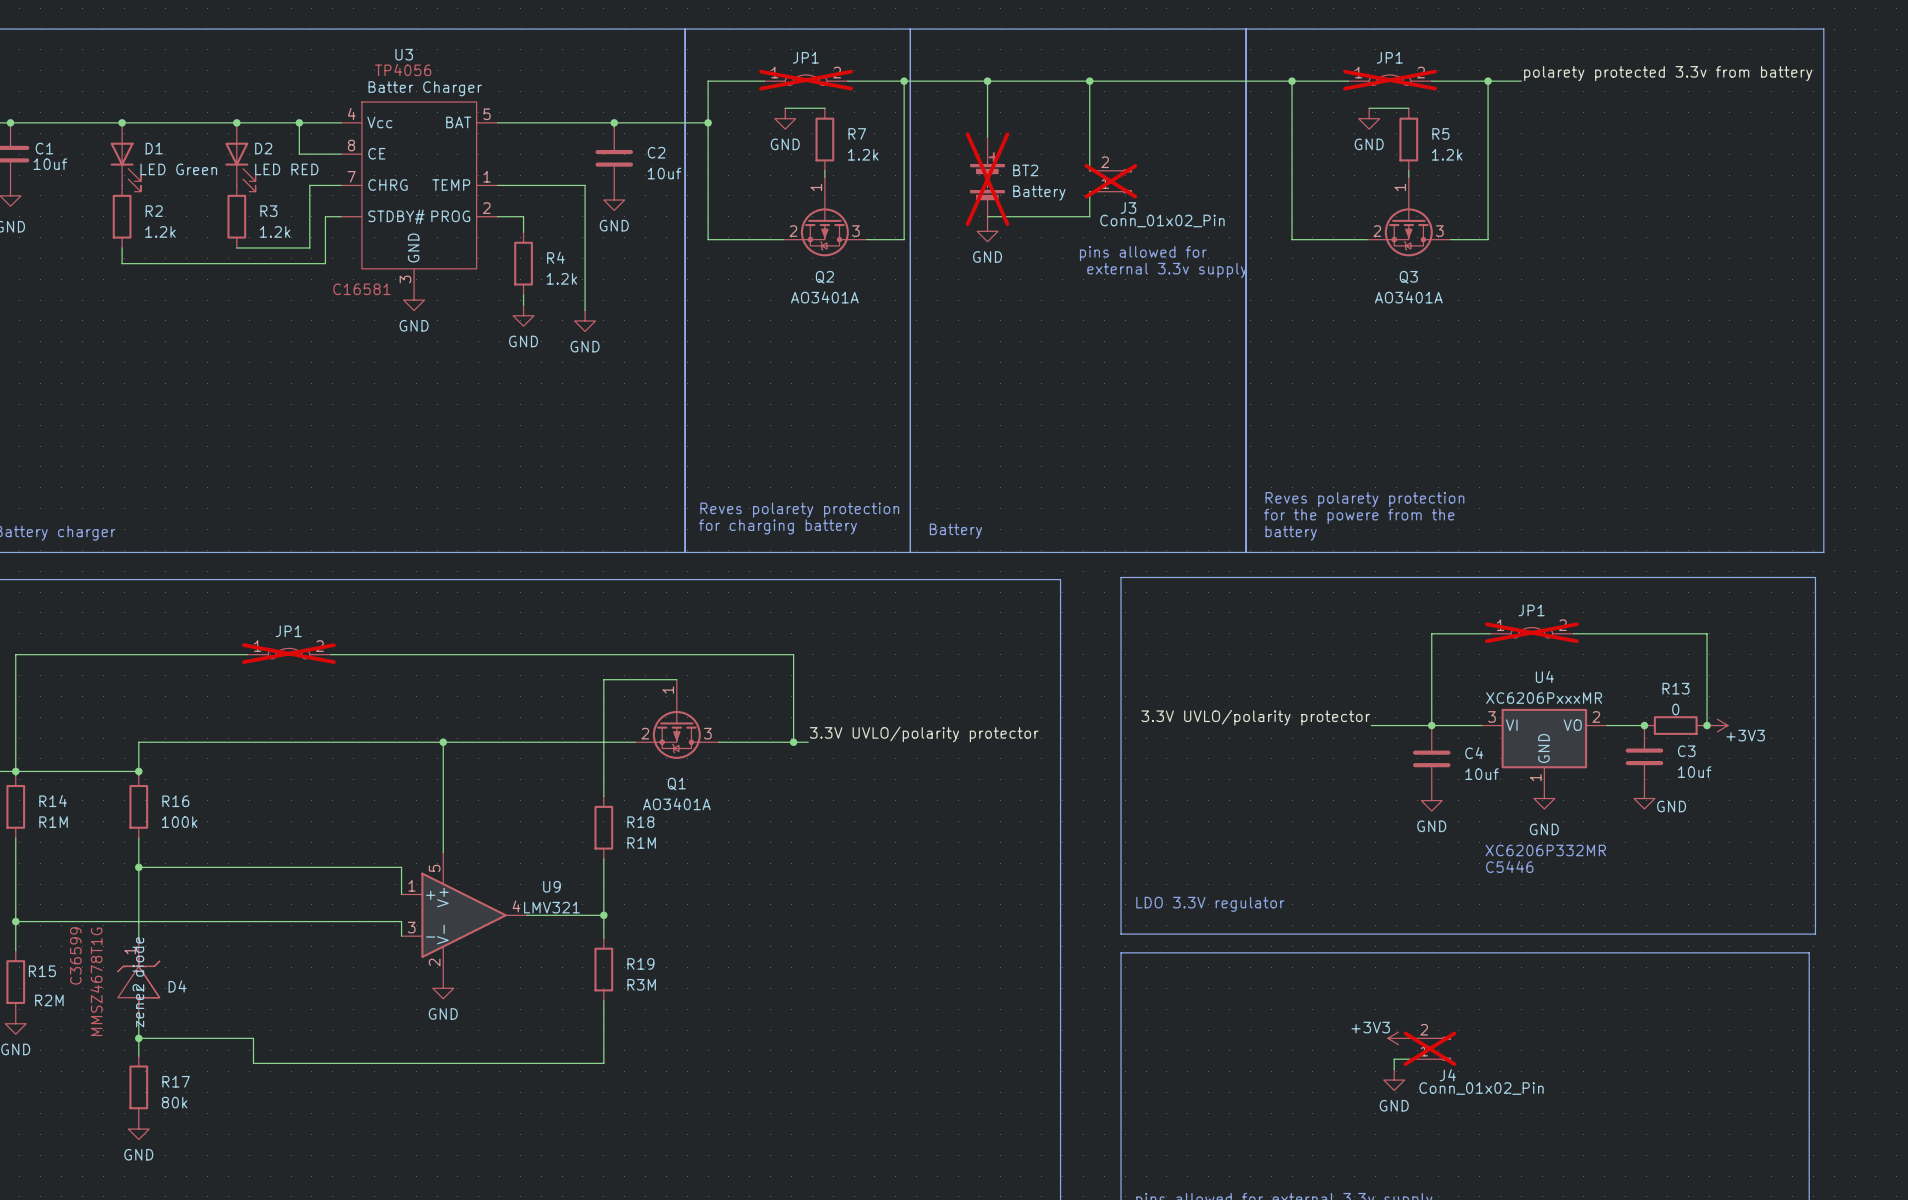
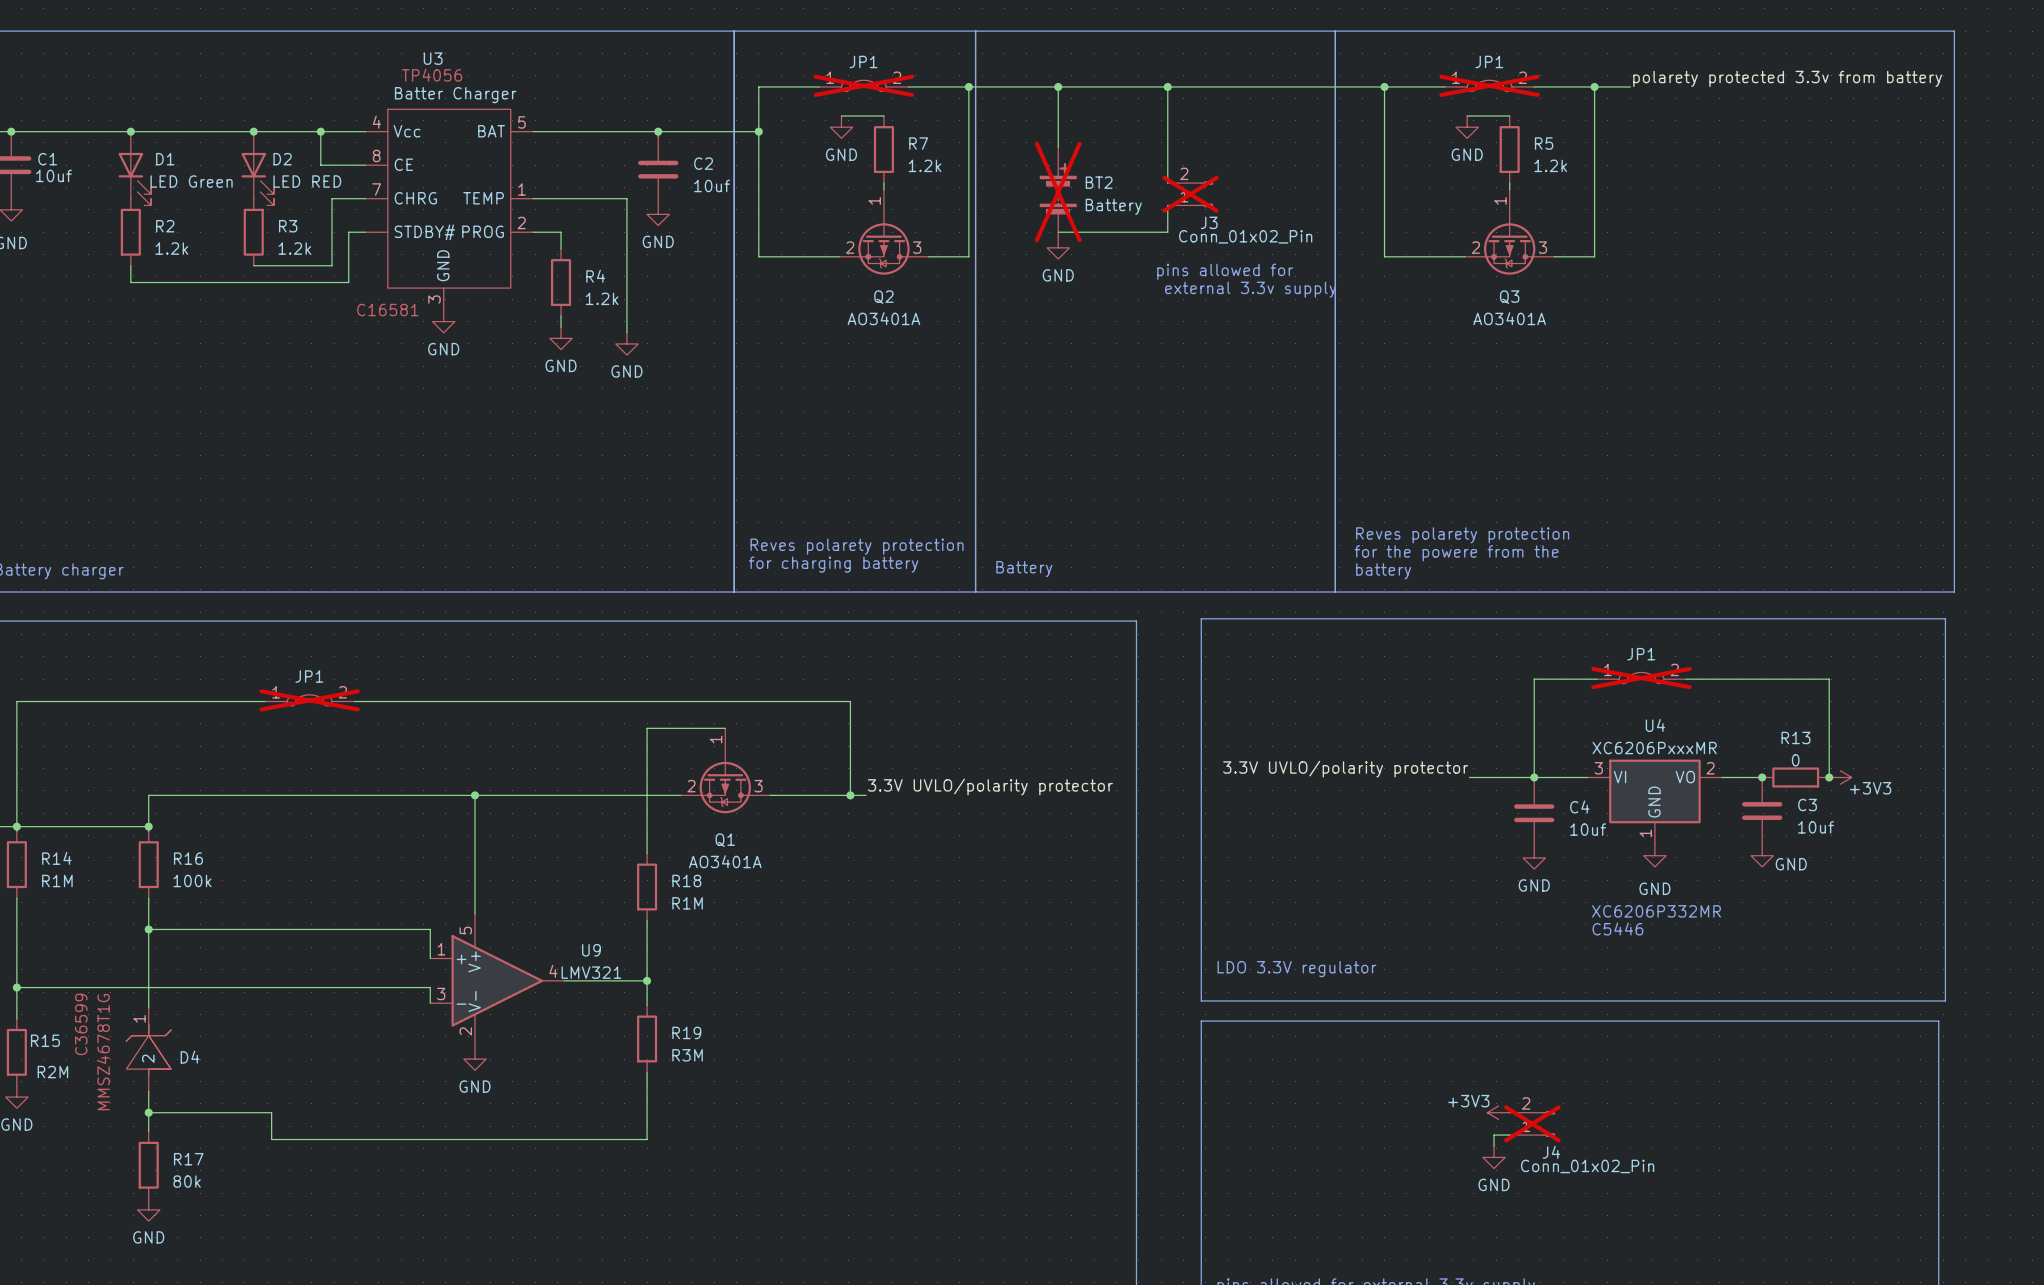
D4 value: zener diode (138, 982) -> none

